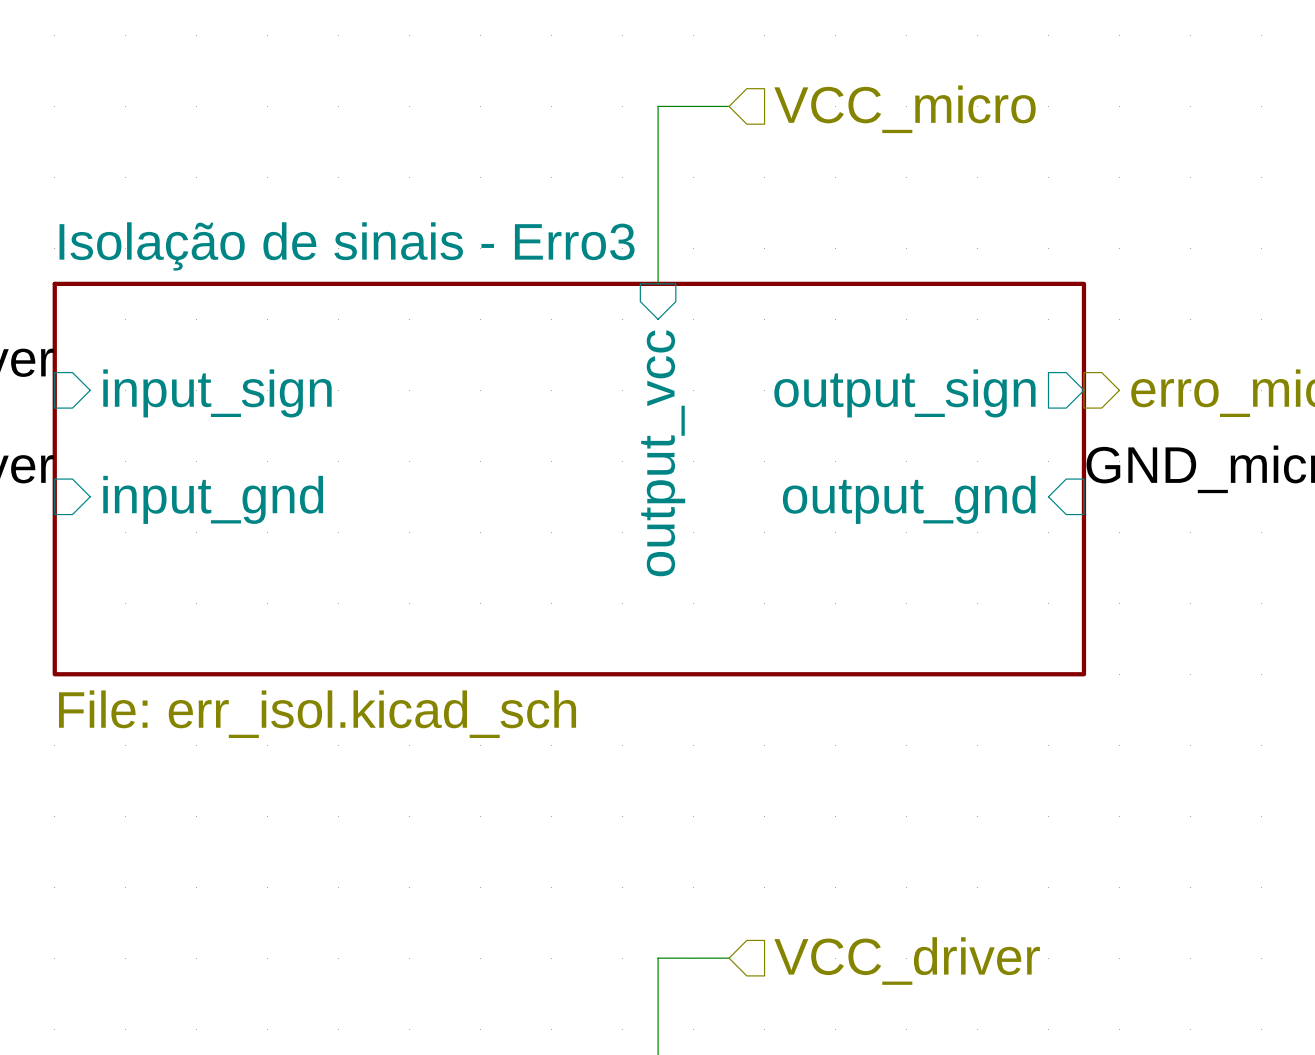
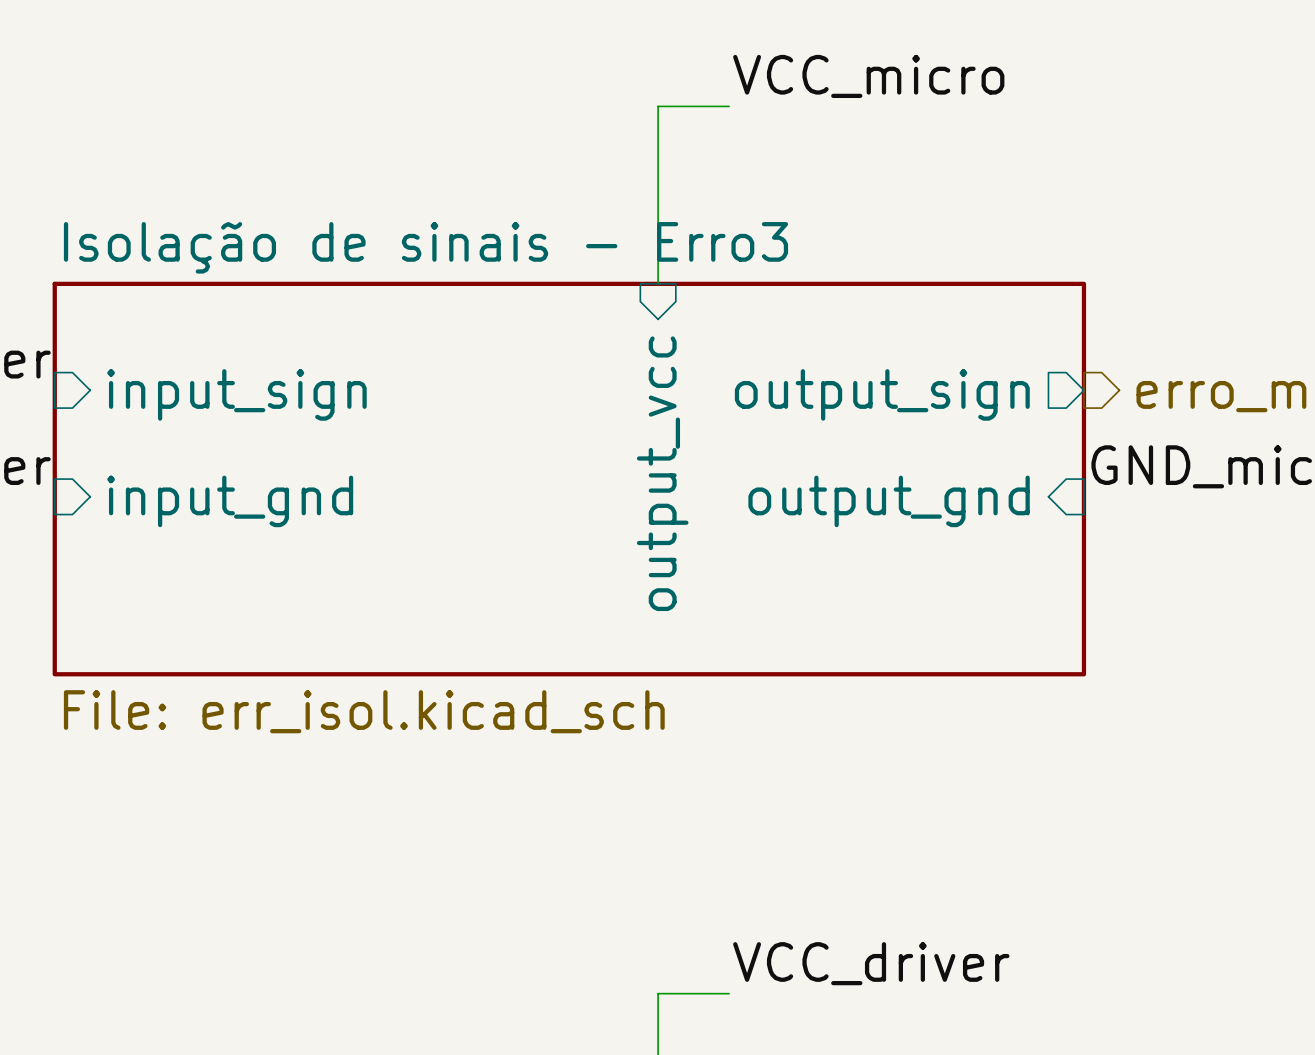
label: none -> VCC_micro (868, 76)
hierarchical label: VCC_micro (905, 109) -> none
wire: (729, 958) (658, 958) (658, 993) -> (729, 993) (658, 993)
hierarchical label: VCC_driver (907, 961) -> none
label: none -> VCC_driver (871, 963)

